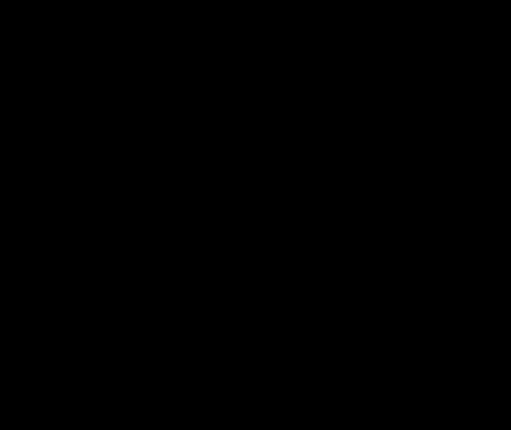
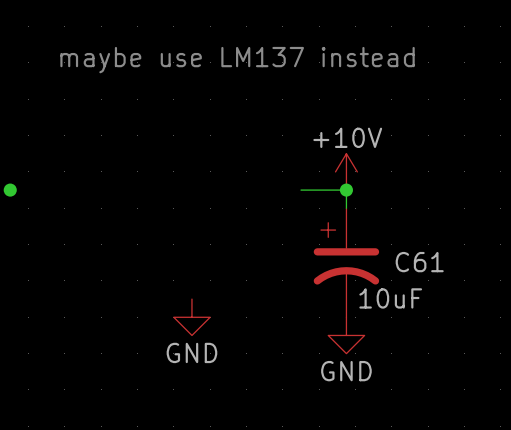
text: none -> maybe use LM137 instead (237, 60)
power symbol: none -> +10V (346, 171)
junction: none -> (10, 190)
wire: none -> (301, 190) (346, 190) (346, 208)
junction: none -> (346, 190)
C61: none -> 10uF (346, 262)
power symbol: none -> GND (191, 317)
power symbol: none -> GND (346, 335)

